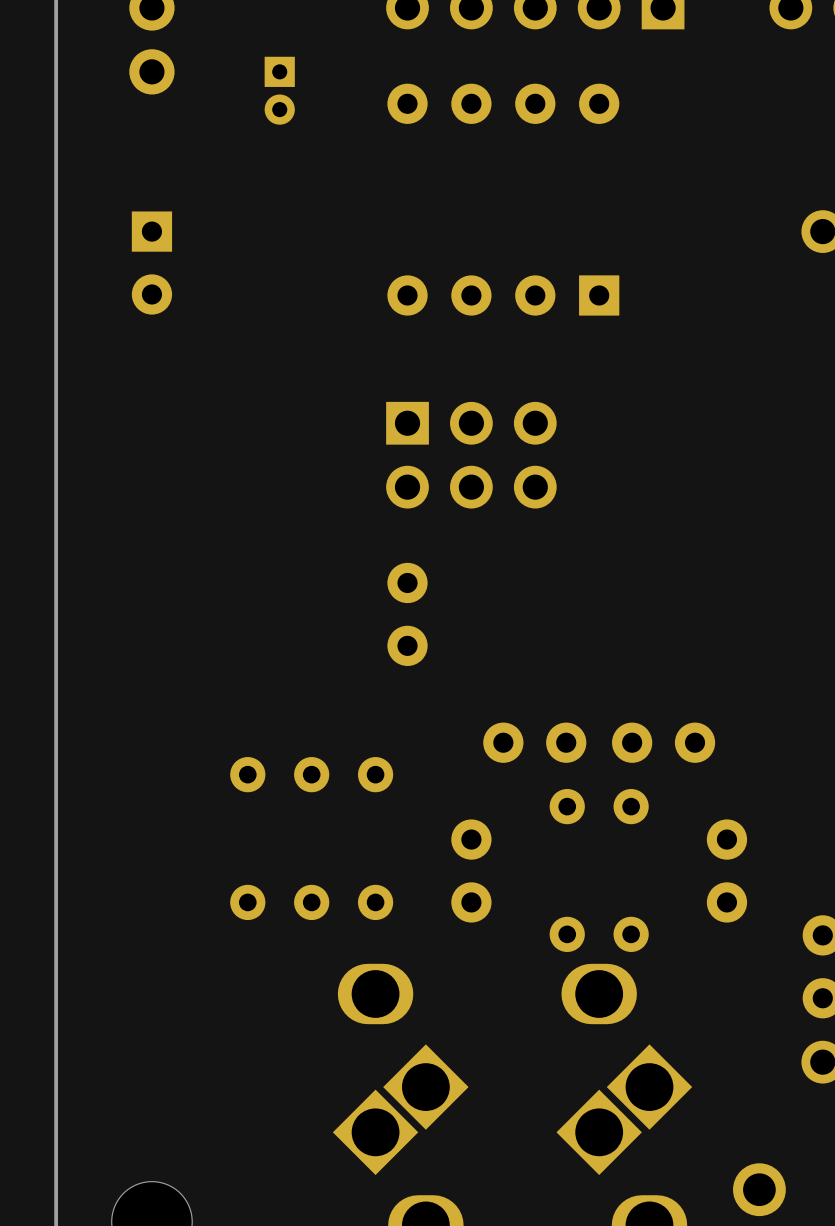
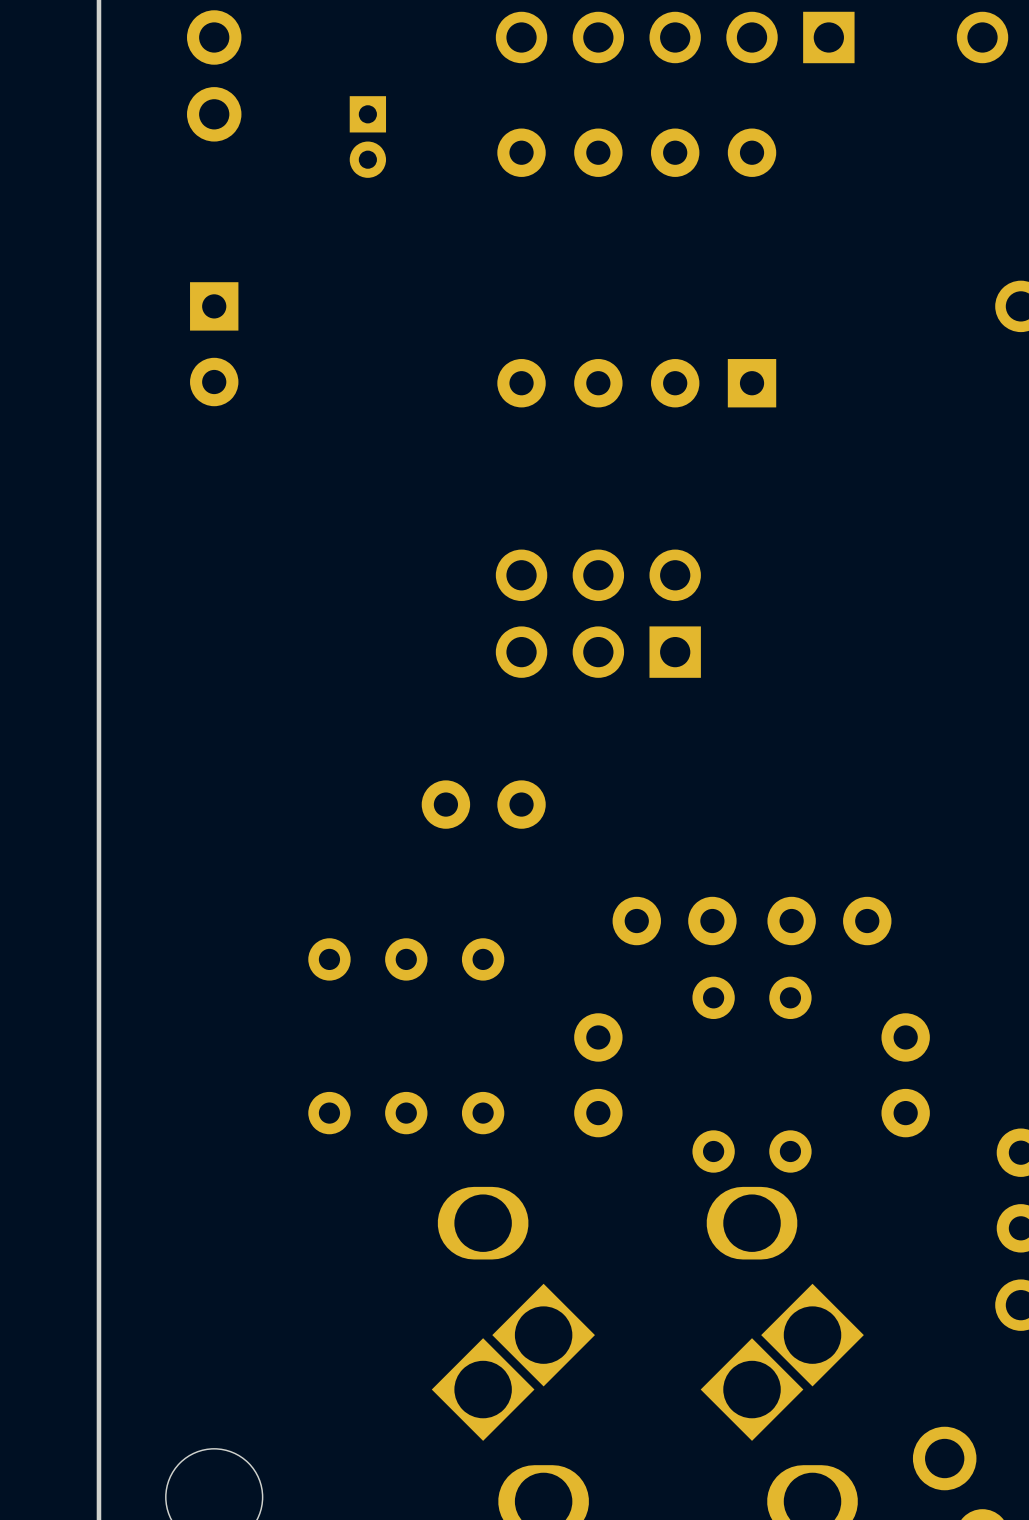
part rotation: 0° (471, 455) -> 180° (598, 613)
part rotation: 0° (407, 614) -> 90° clockwise (483, 804)

